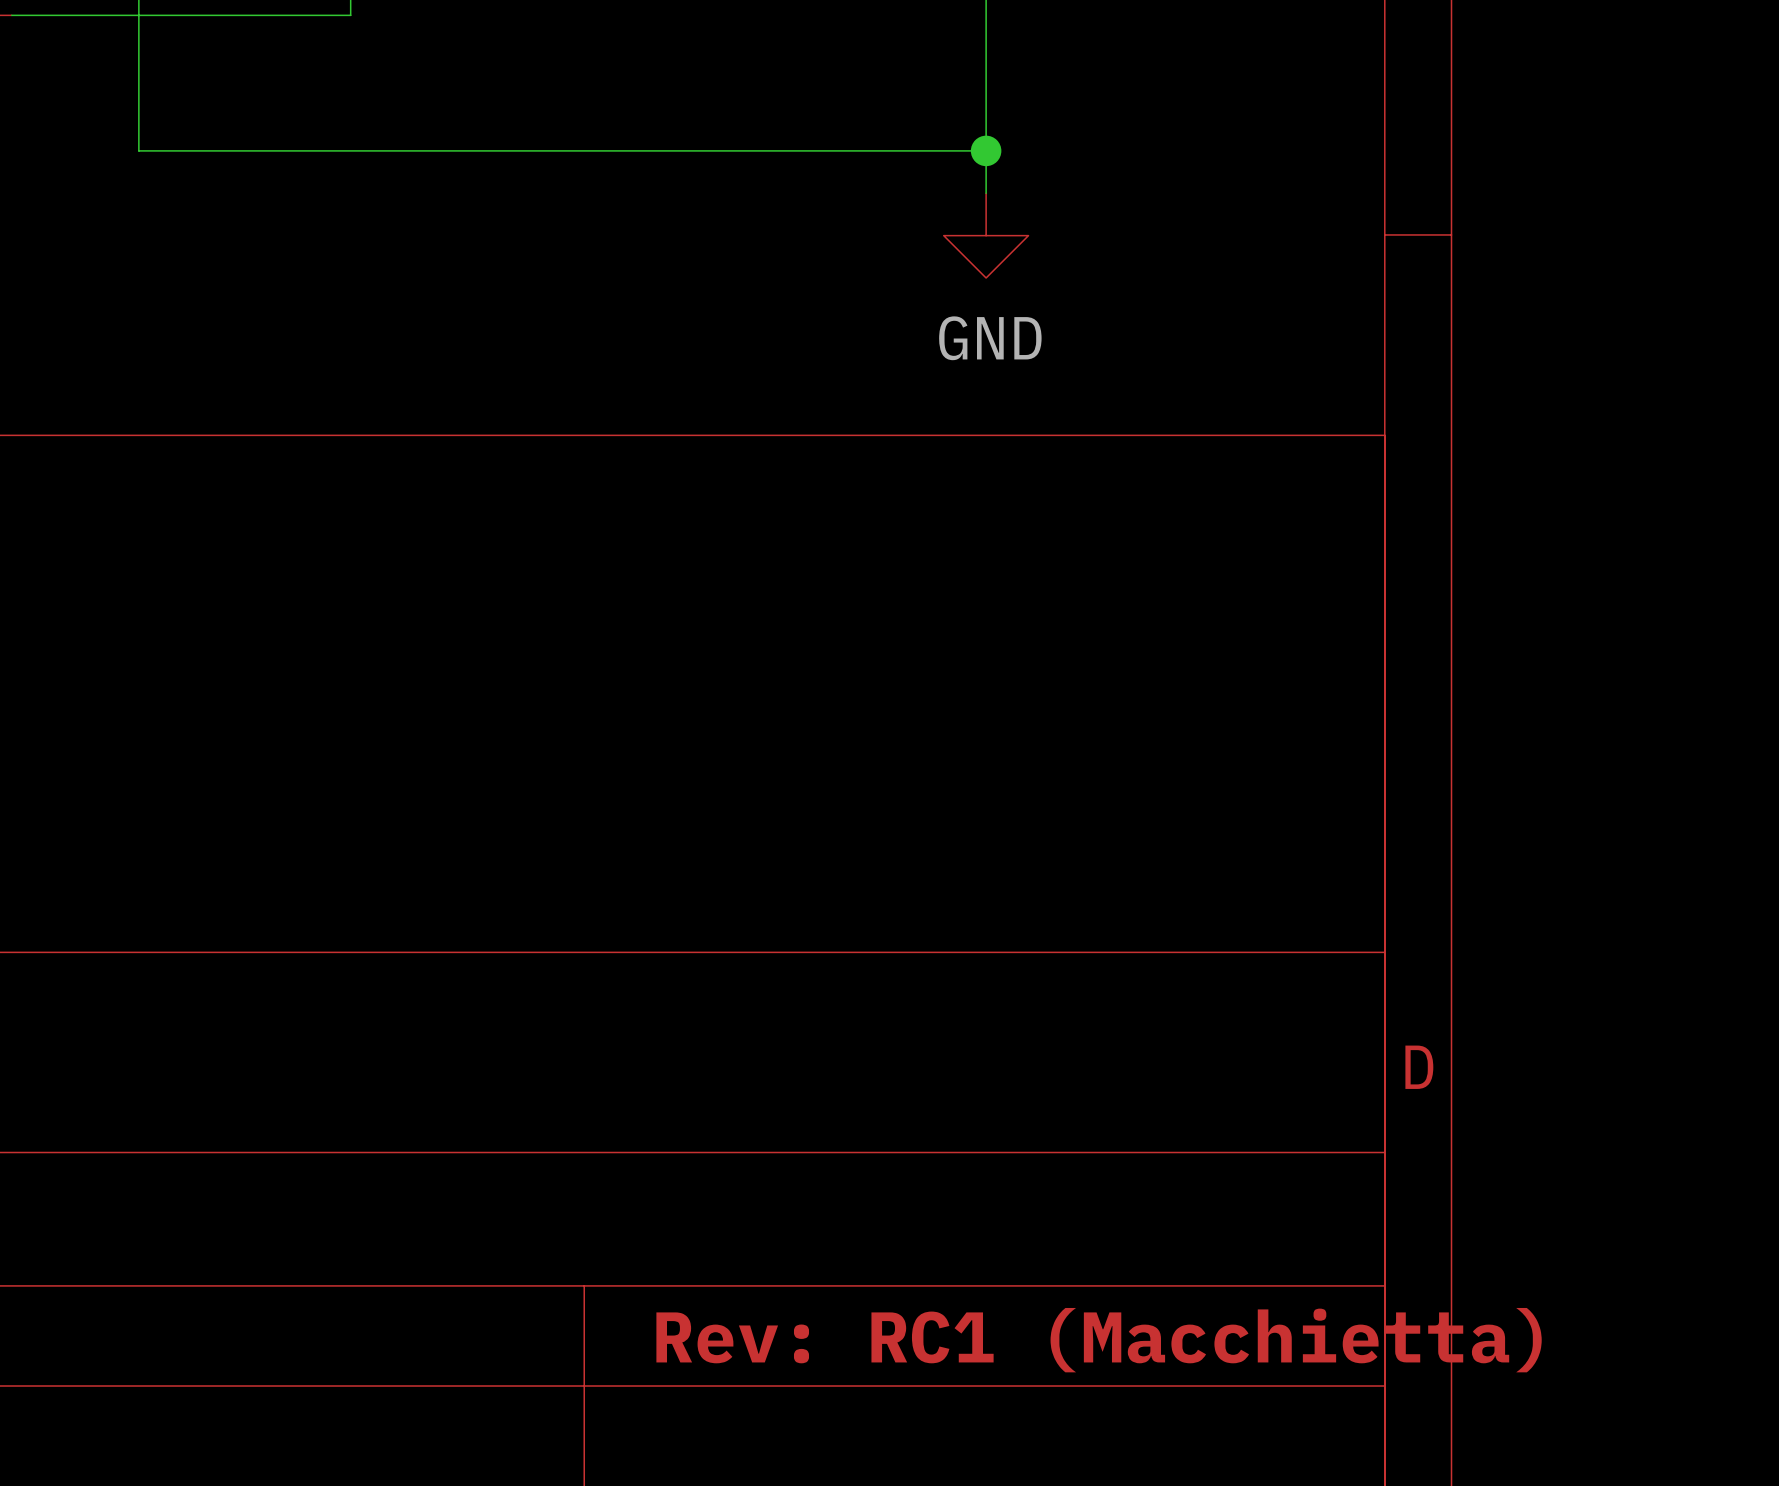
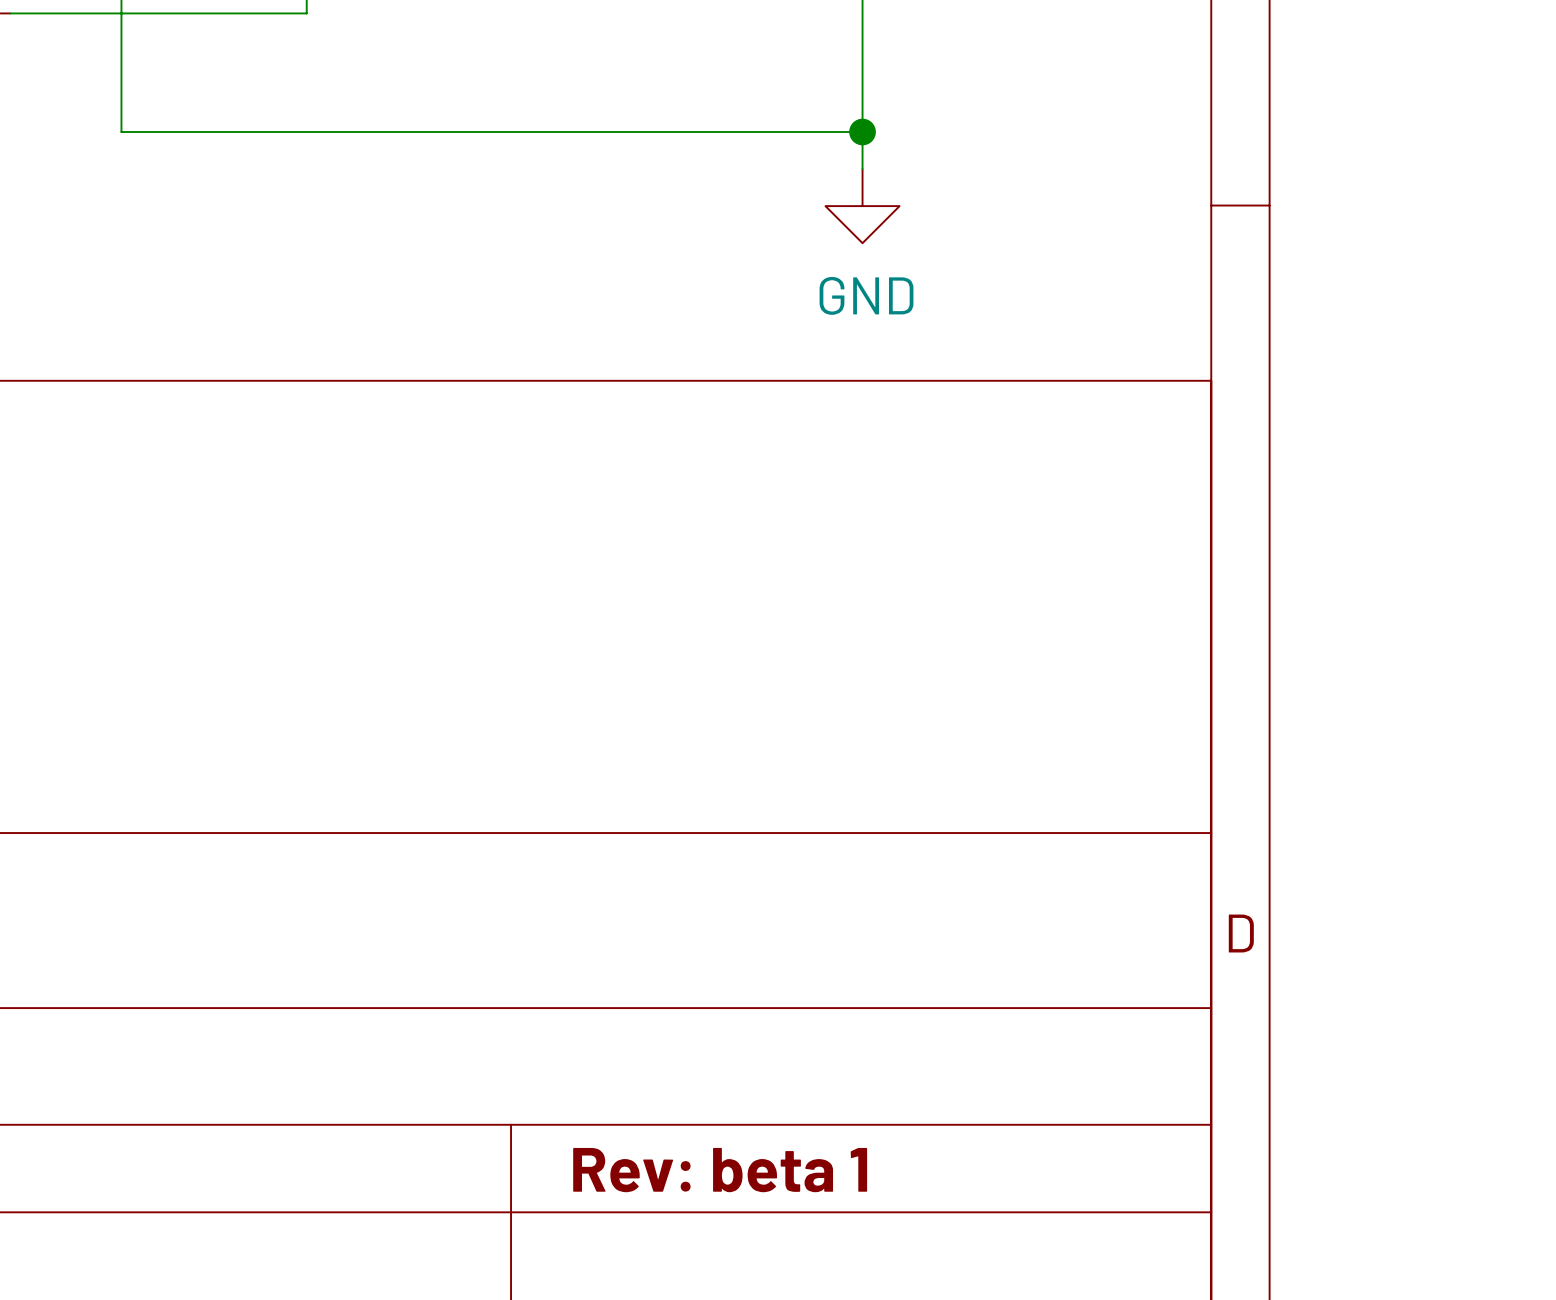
title block: Rev: RC1 (Macchietta) (1099, 1340) -> Rev: beta 1 (720, 1170)

